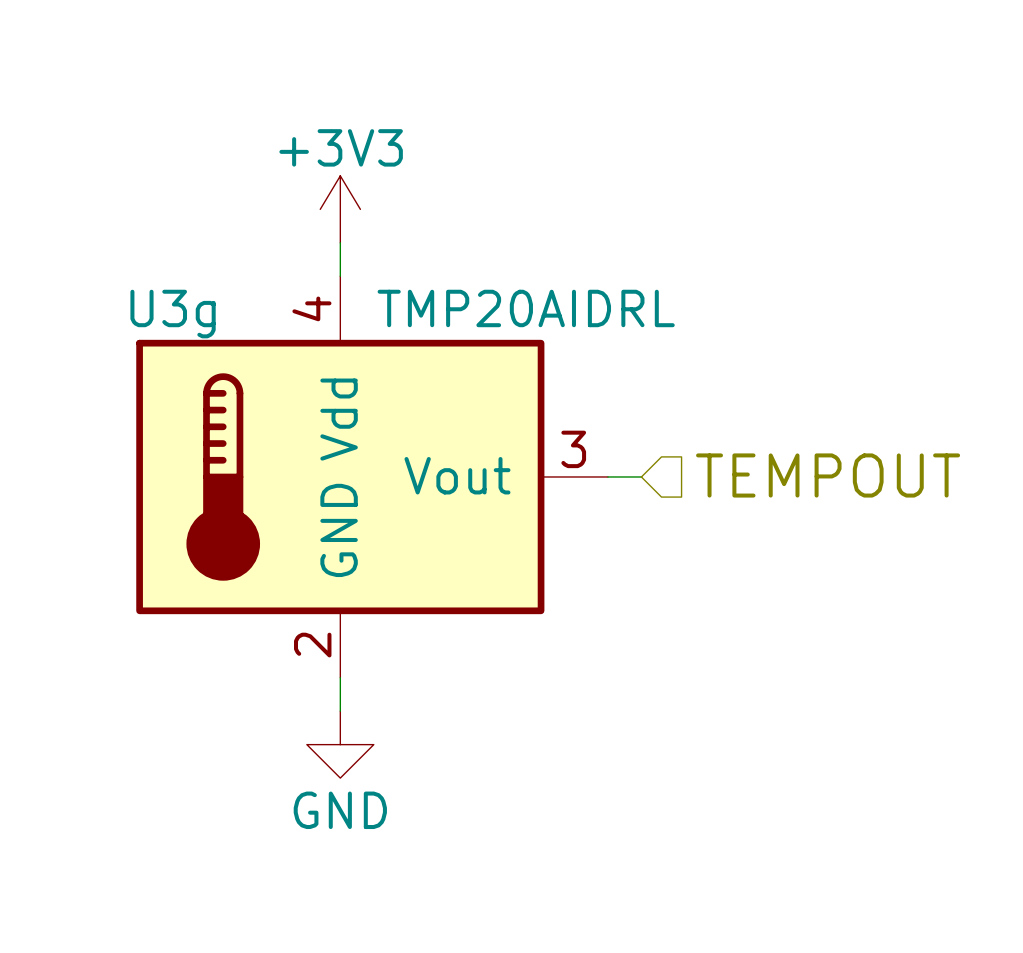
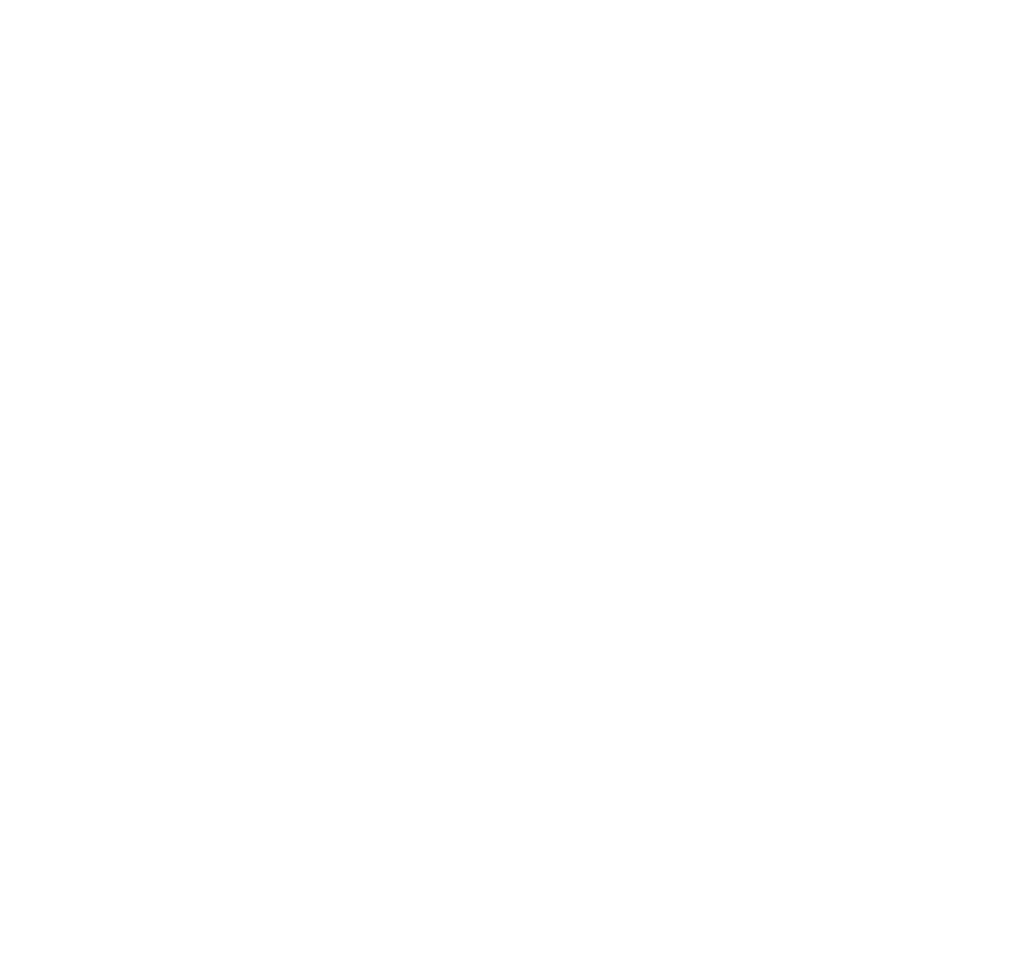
power symbol: +3V3 (340, 209) -> none
wire: (340, 242) (340, 276) -> none
hierarchical label: TEMPOUT (828, 475) -> none
U3g: TMP20AIDRL (372, 476) -> none
wire: (607, 476) (641, 476) -> none
wire: (340, 677) (340, 711) -> none
power symbol: GND (340, 744) -> none

